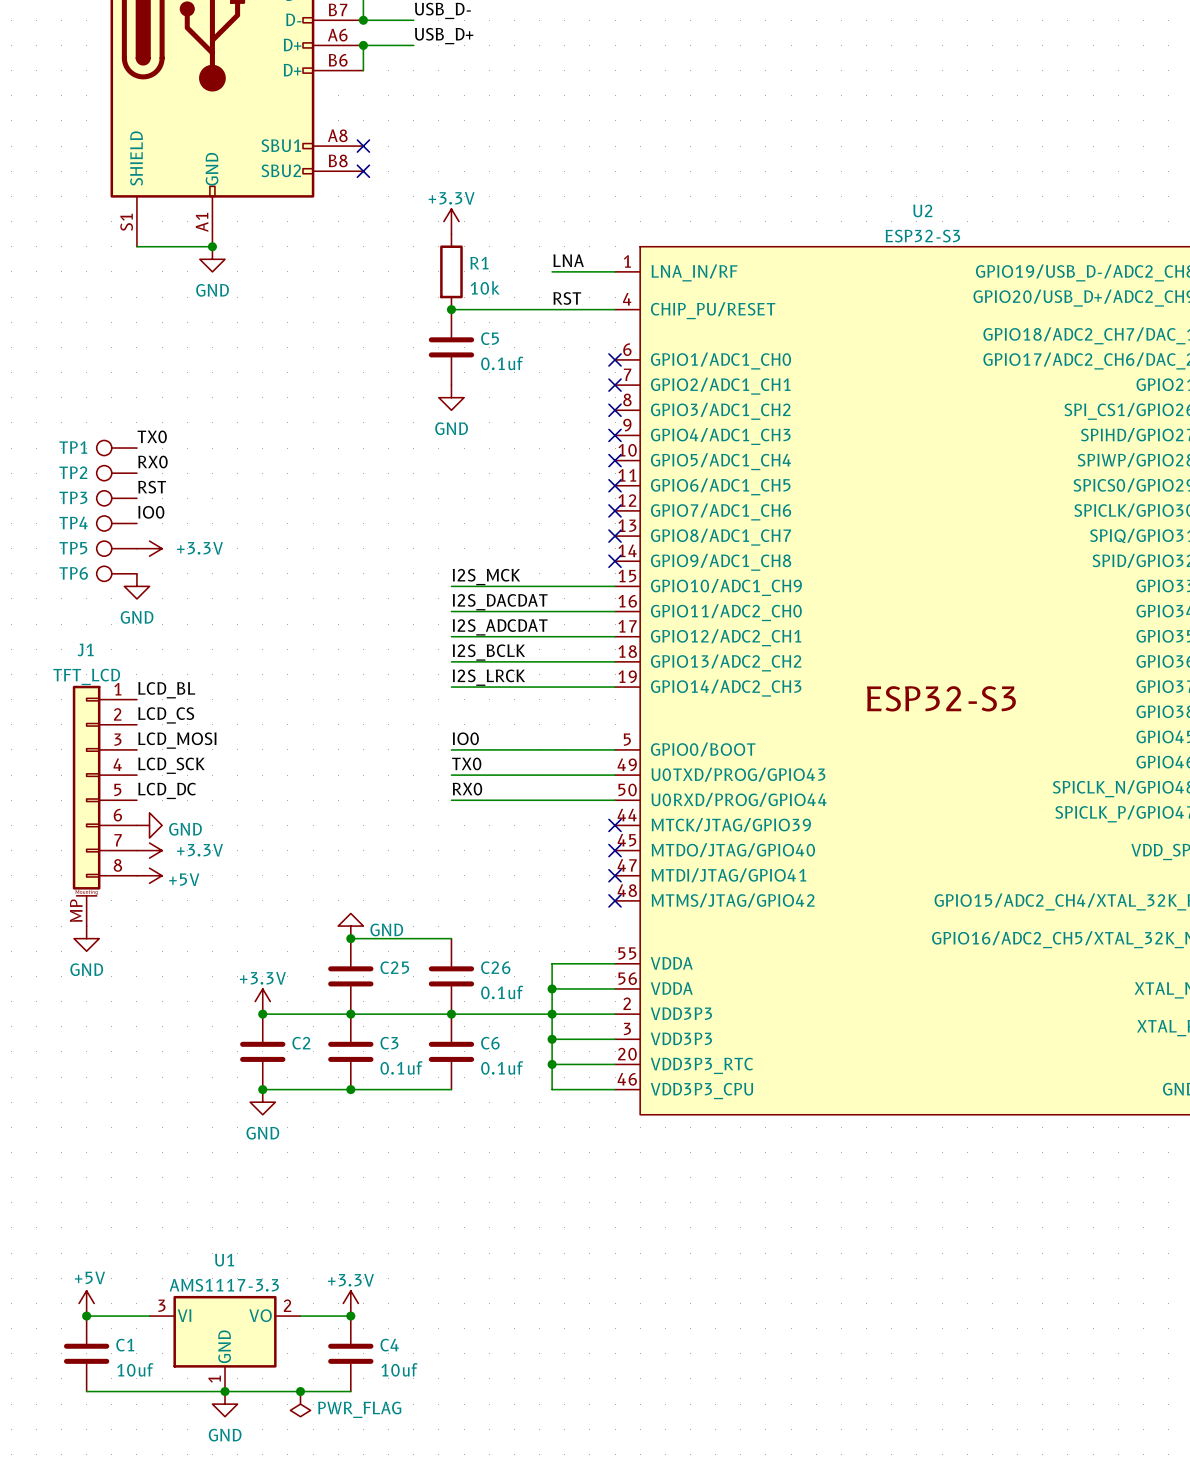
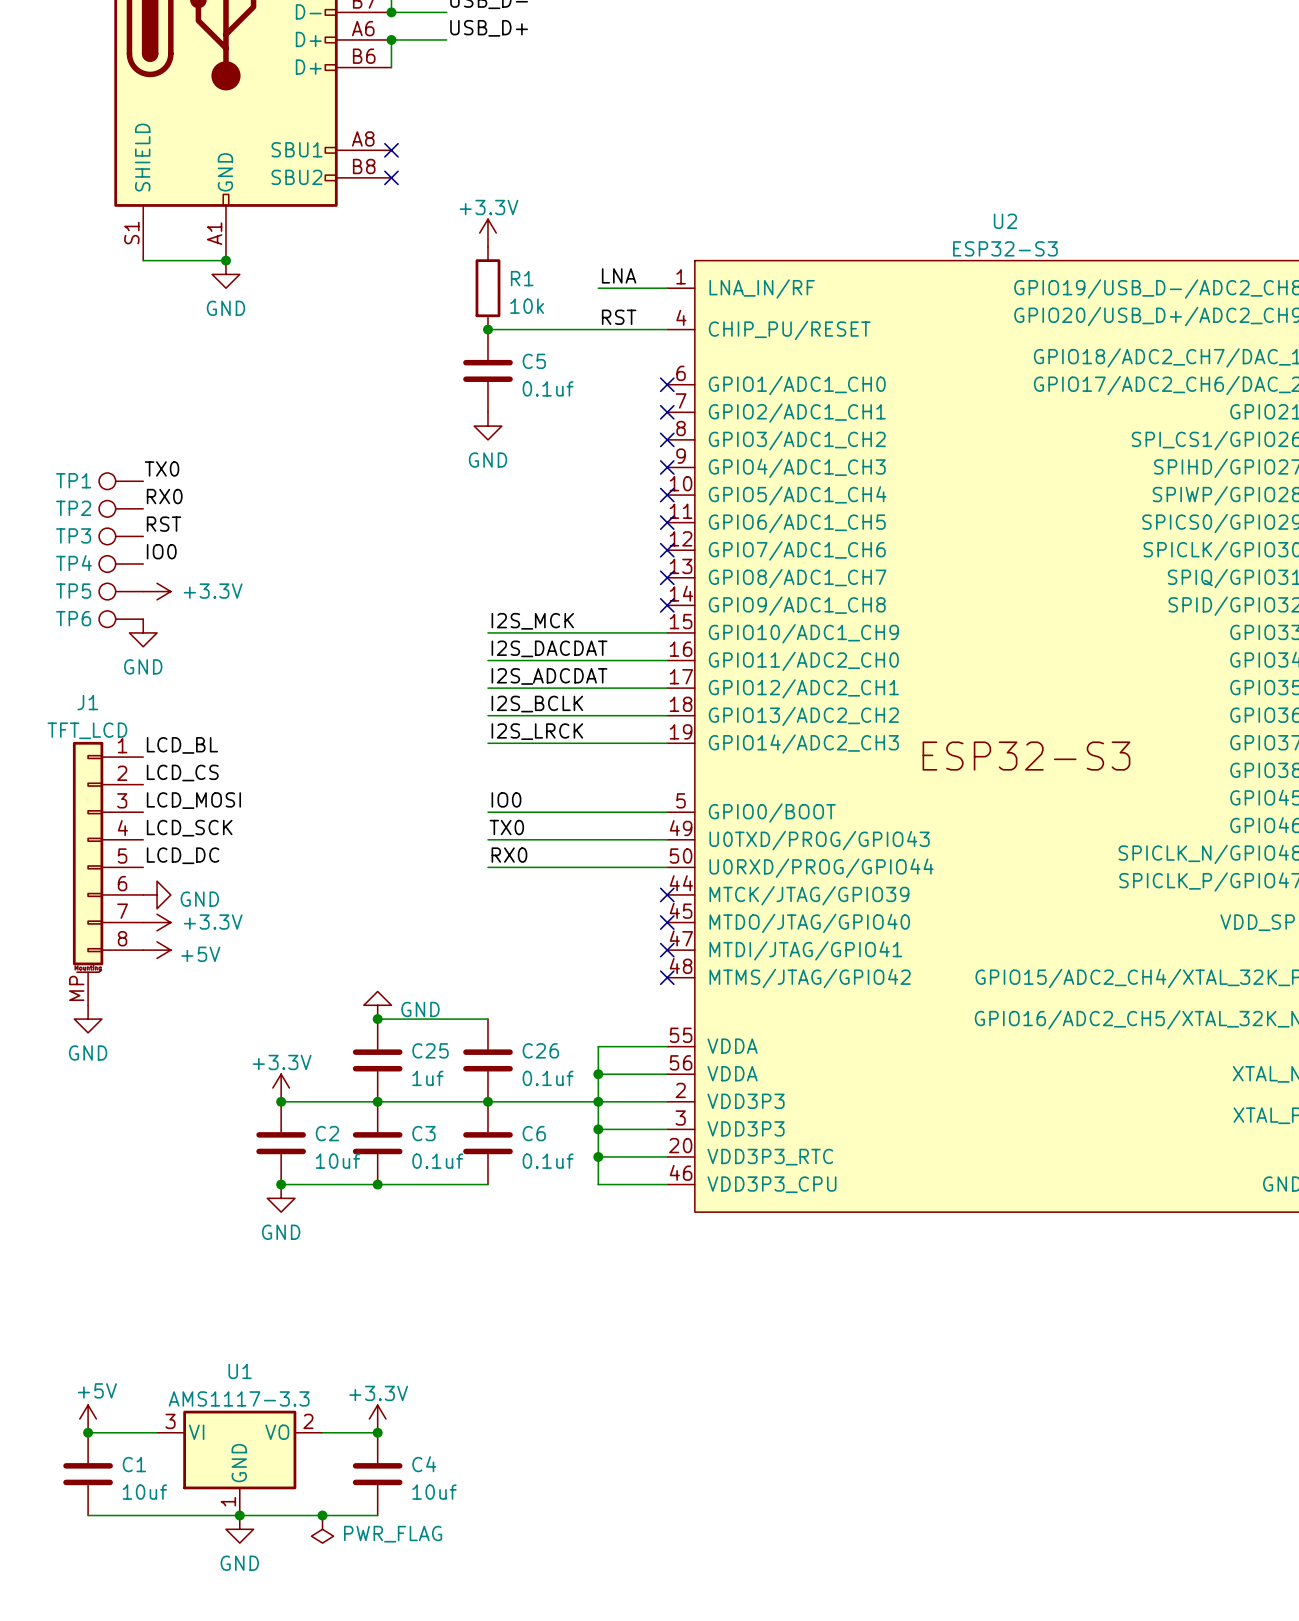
C25 value: none -> 1uf (427, 1078)
C2 value: none -> 10uf (337, 1161)

